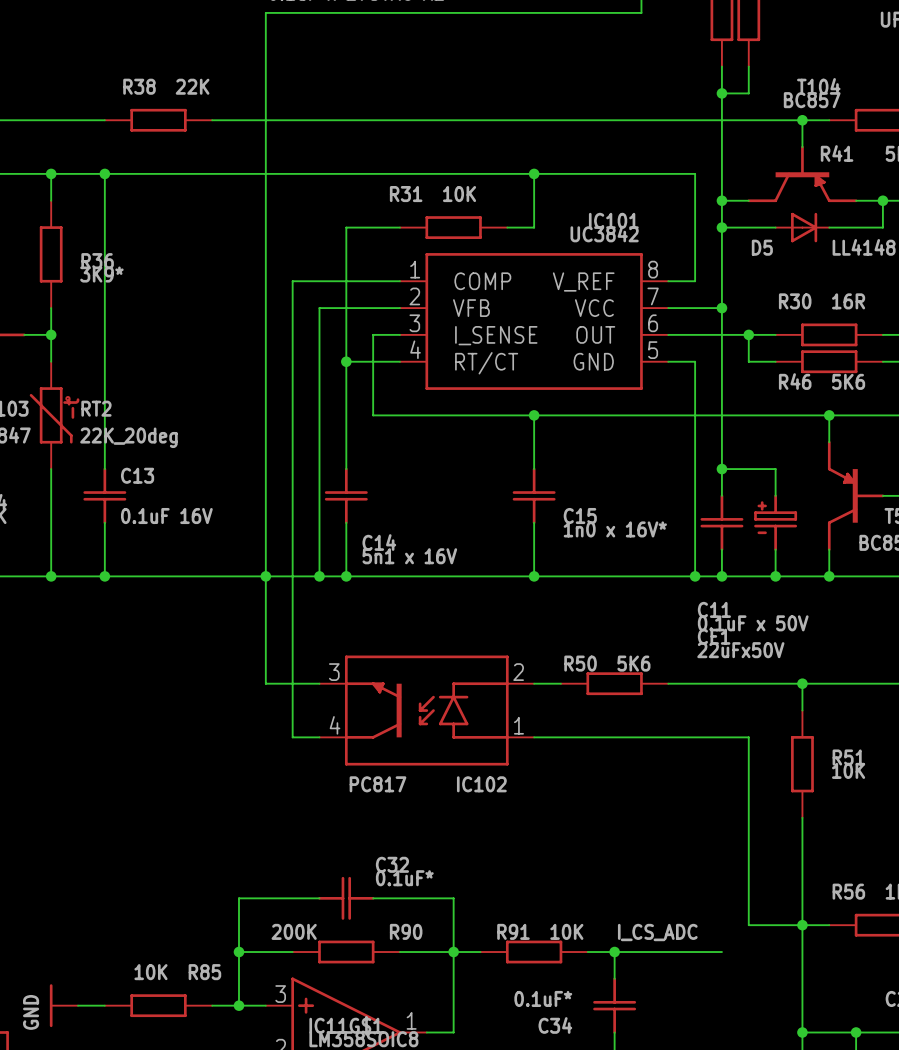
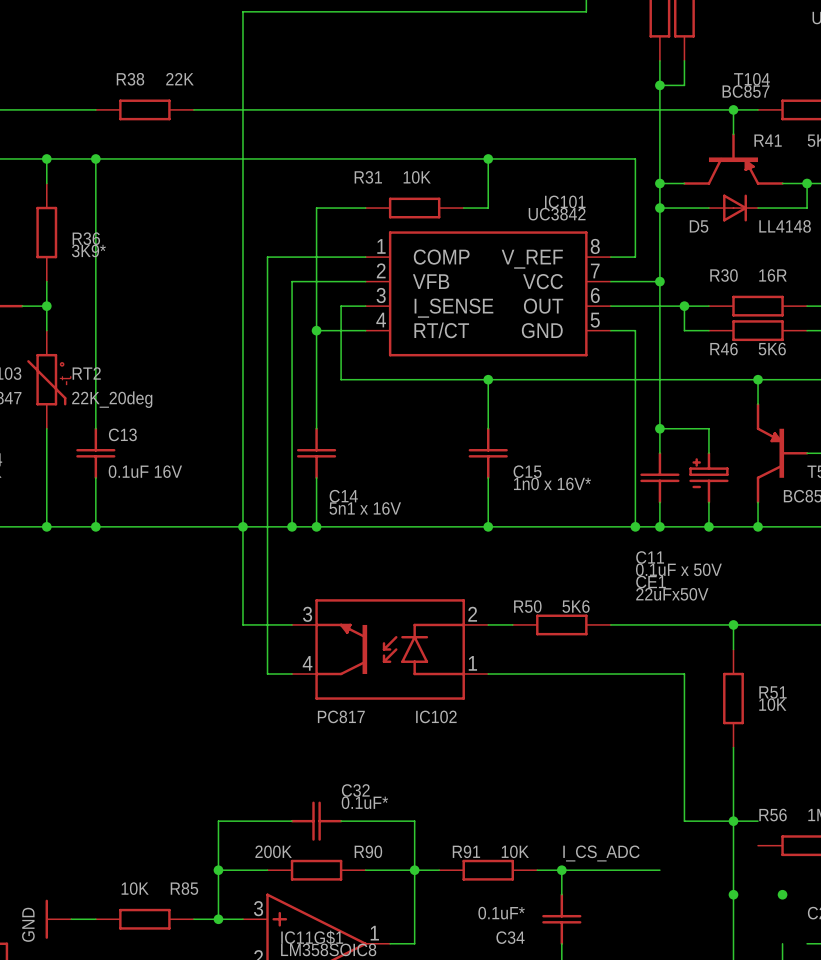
wire: (748, 898) (748, 925) (829, 925) -> (684, 821) (758, 821)
junction: none -> (733, 821)
junction: (802, 925) -> none
junction: none -> (733, 894)
junction: none -> (782, 894)
wire: (802, 1032) (882, 1032) -> none
junction: (802, 1032) -> none
junction: (856, 1032) -> none

